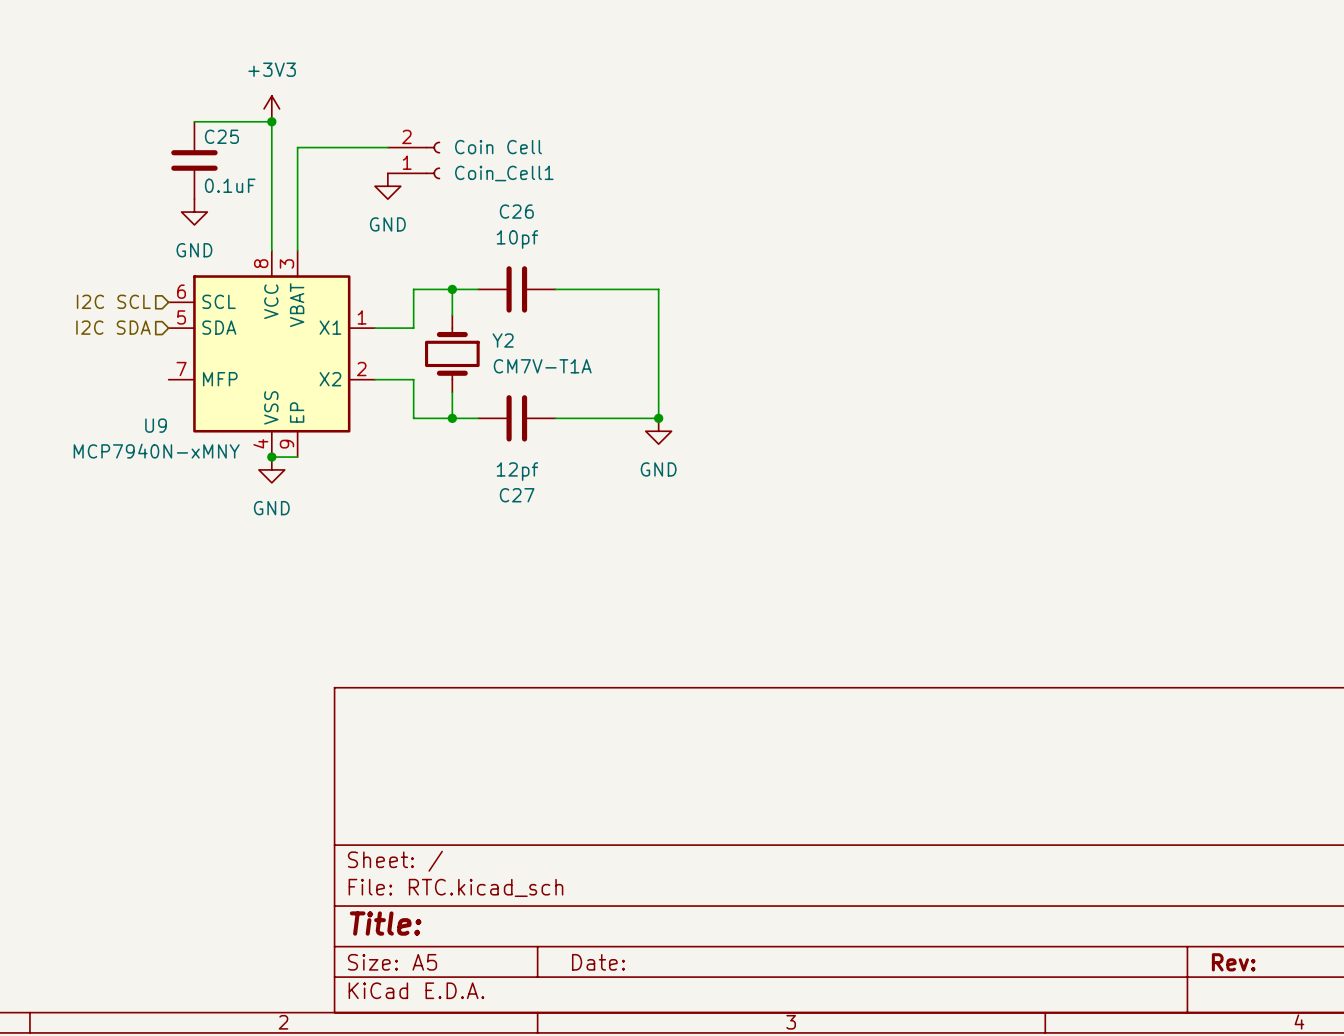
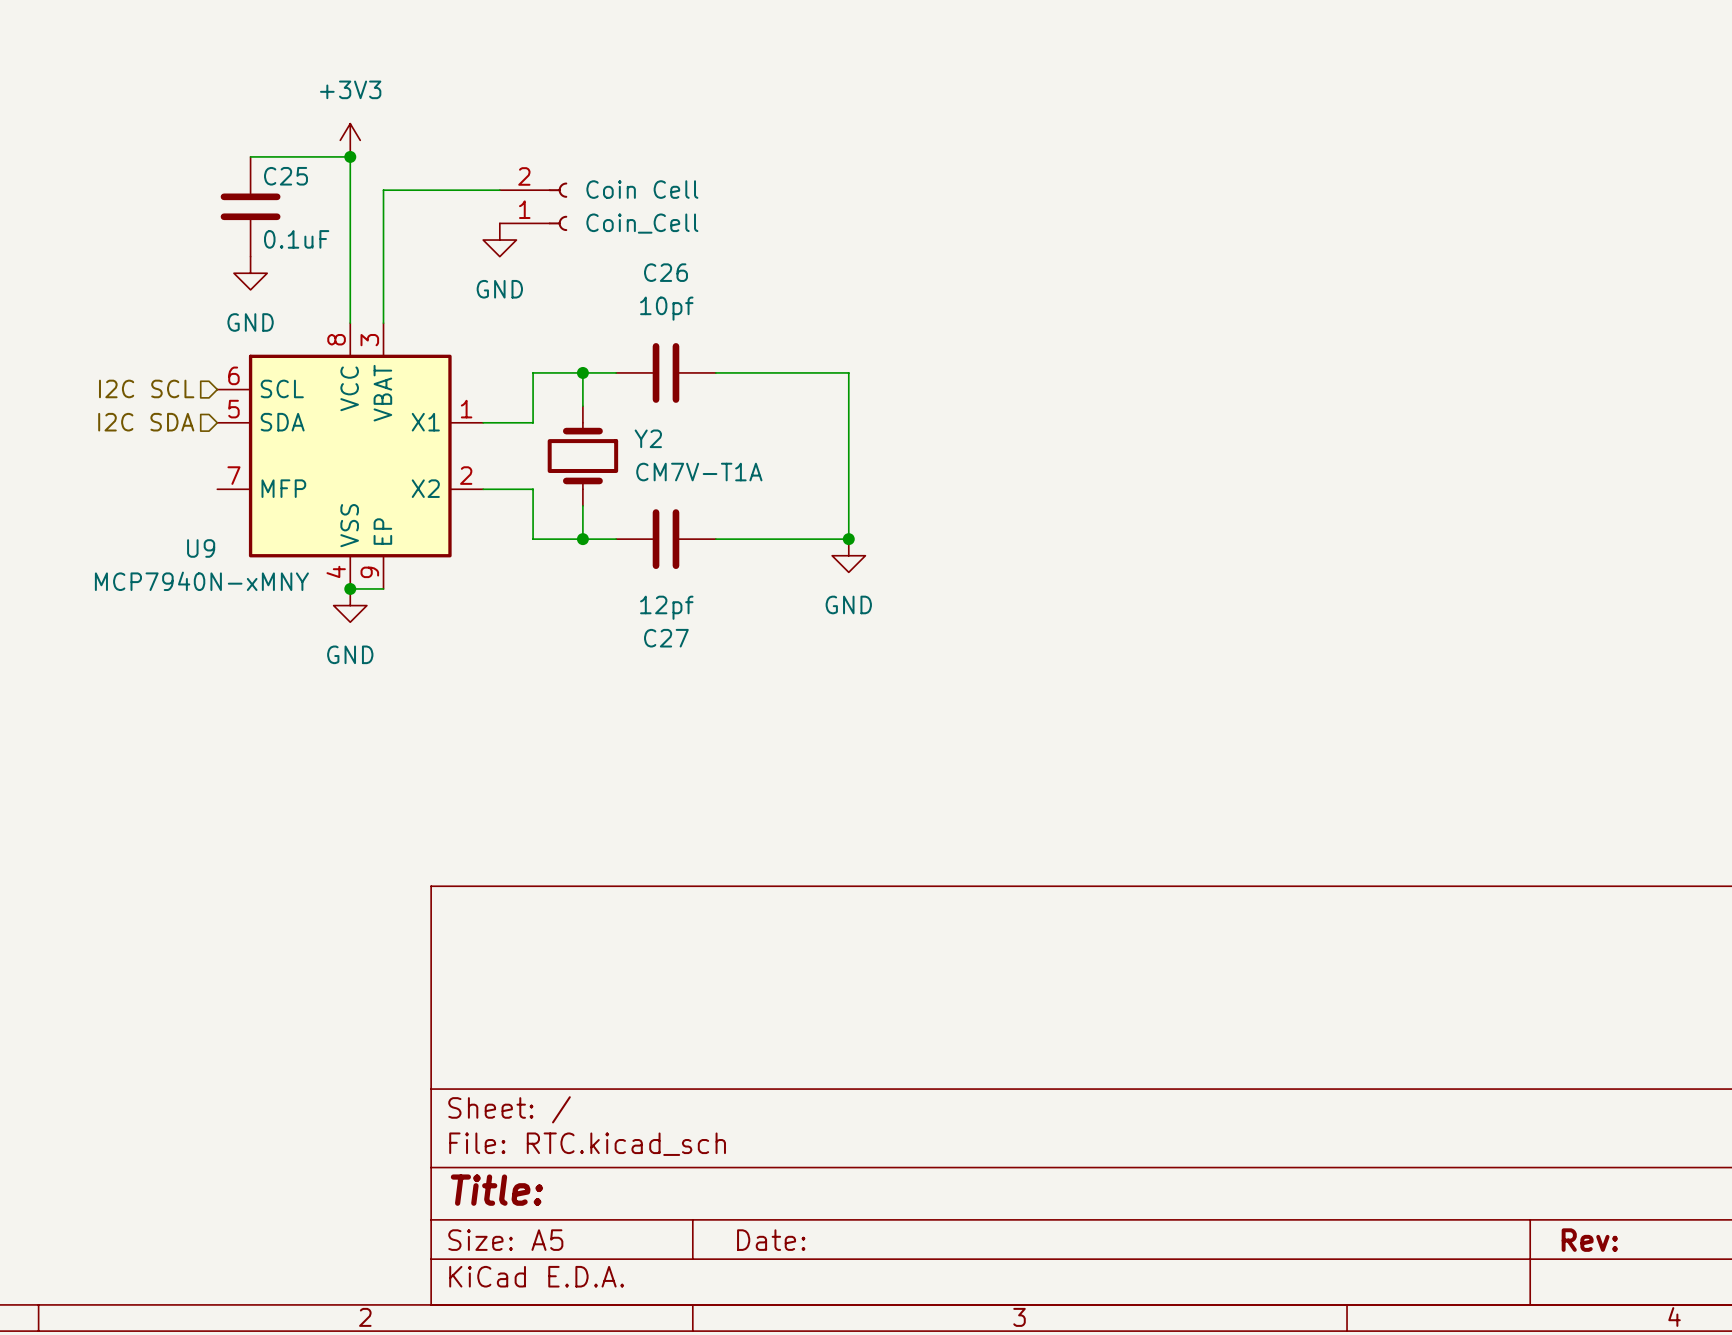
Coin_Cell1 name: Coin_Cell1 (504, 173) -> Coin_Cell (642, 223)

